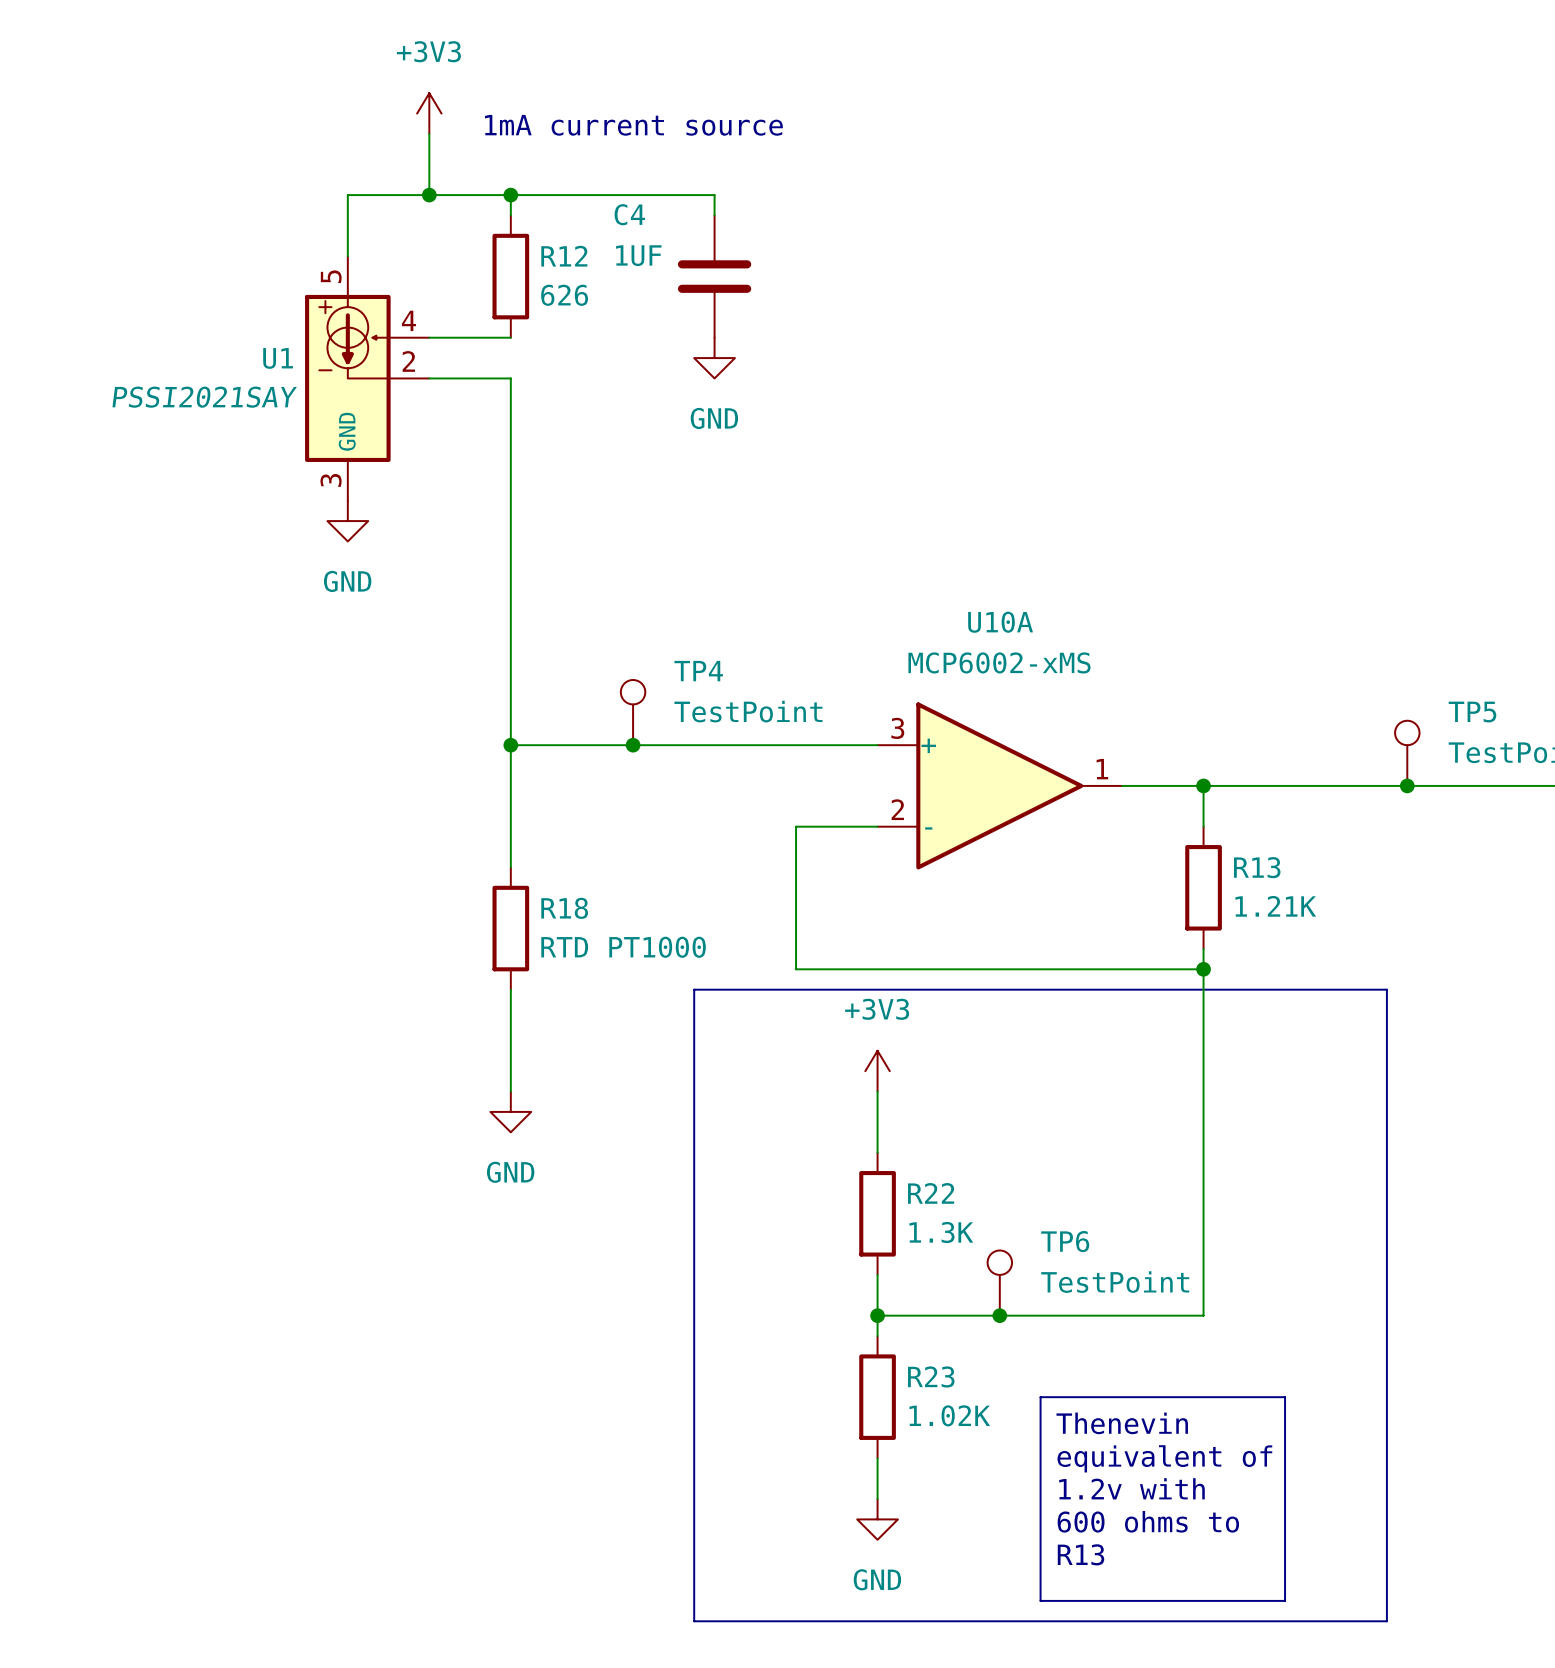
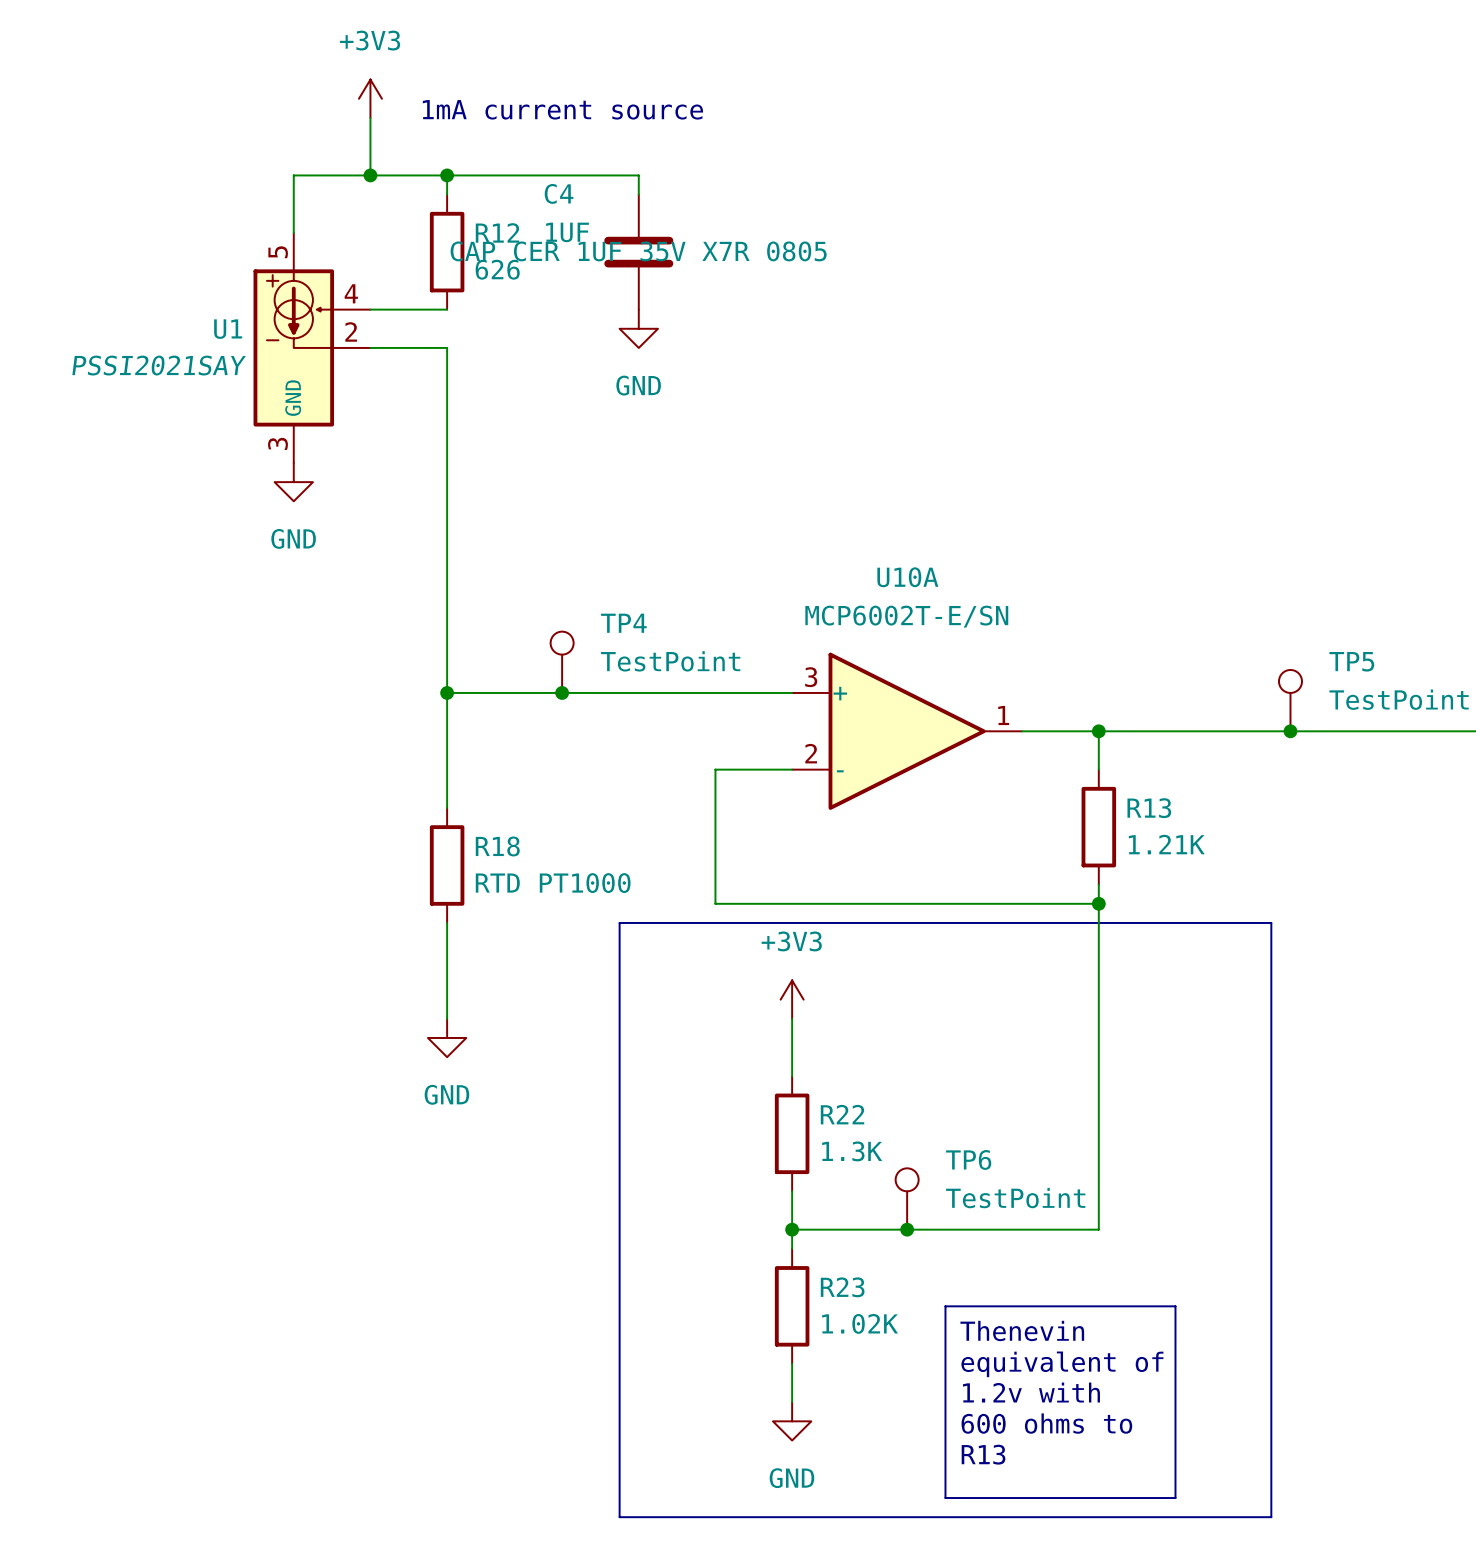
C4 text: none -> CAP CER 1UF 35V X7R 0805 (638, 251)
U10A value: MCP6002-xMS (999, 662) -> MCP6002T-E/SN (906, 616)

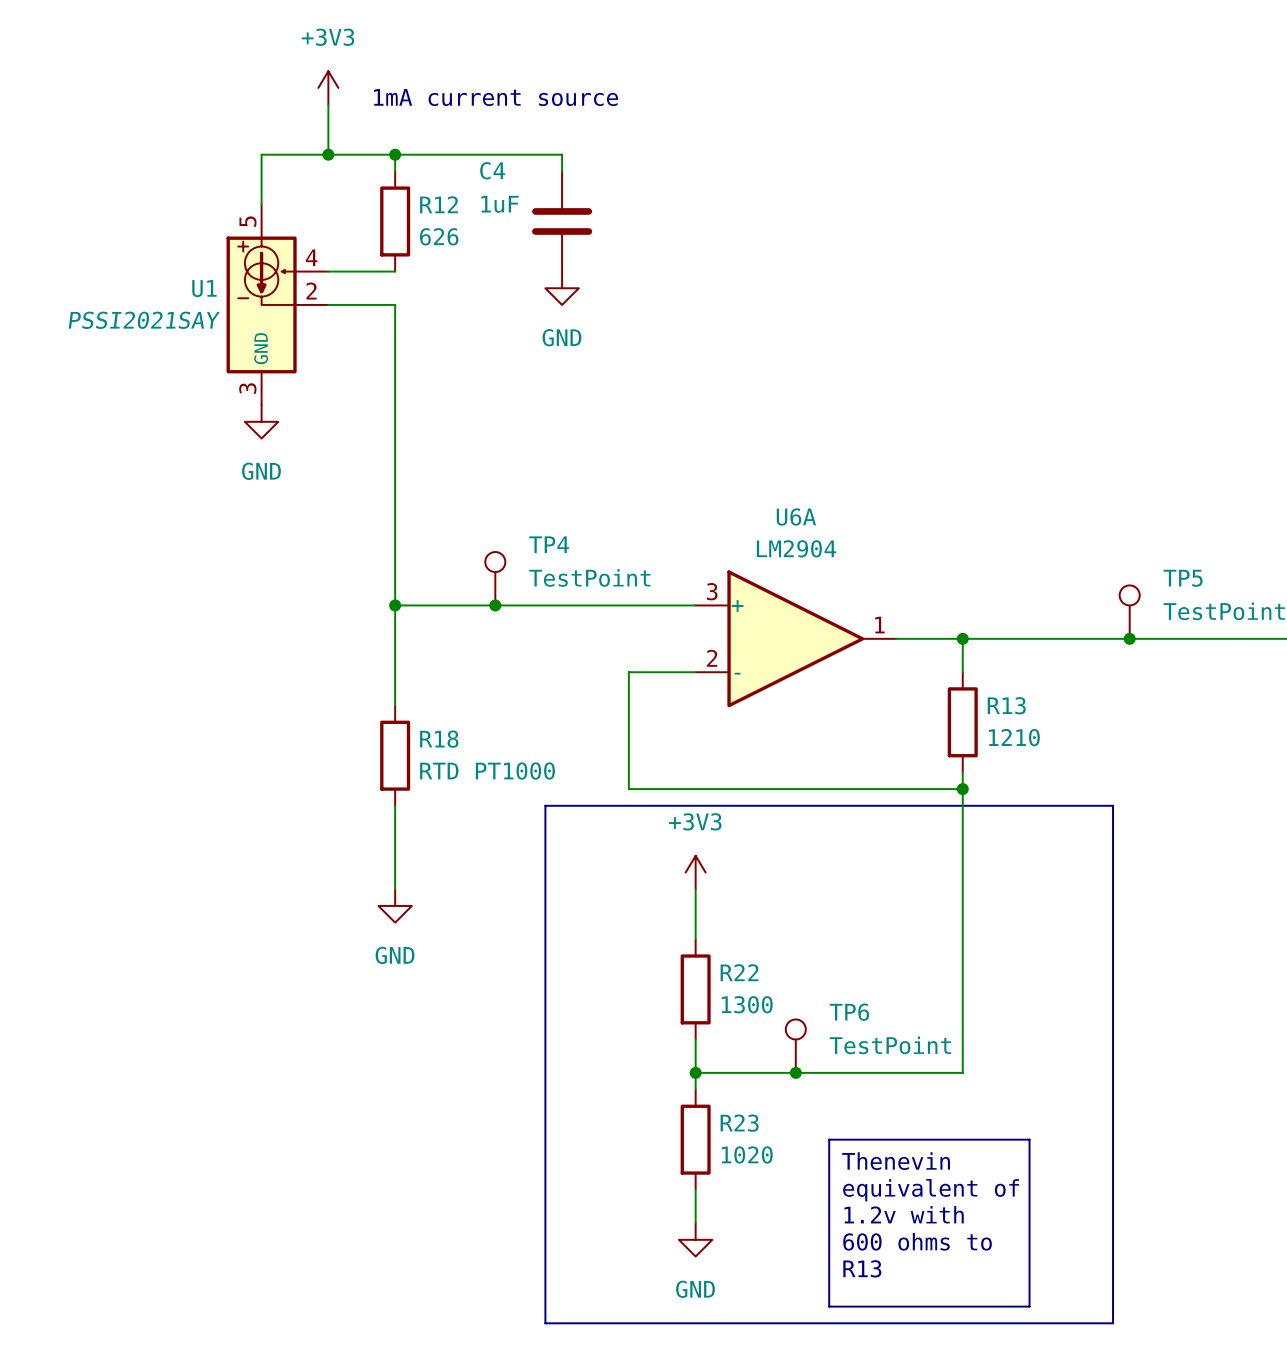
C4 value: 1UF (567, 232) -> 1uF (500, 204)
C4 text: CAP CER 1UF 35V X7R 0805 (638, 251) -> none
U10A name: U10A (907, 577) -> U6A (796, 516)
U10A value: MCP6002T-E/SN (906, 616) -> LM2904 (796, 548)
R13 value: 1.21K (1166, 844) -> 1210 (1014, 737)
R22 value: 1.3K (852, 1151) -> 1300 (747, 1004)
R23 value: 1.02K (860, 1323) -> 1020 (747, 1154)

